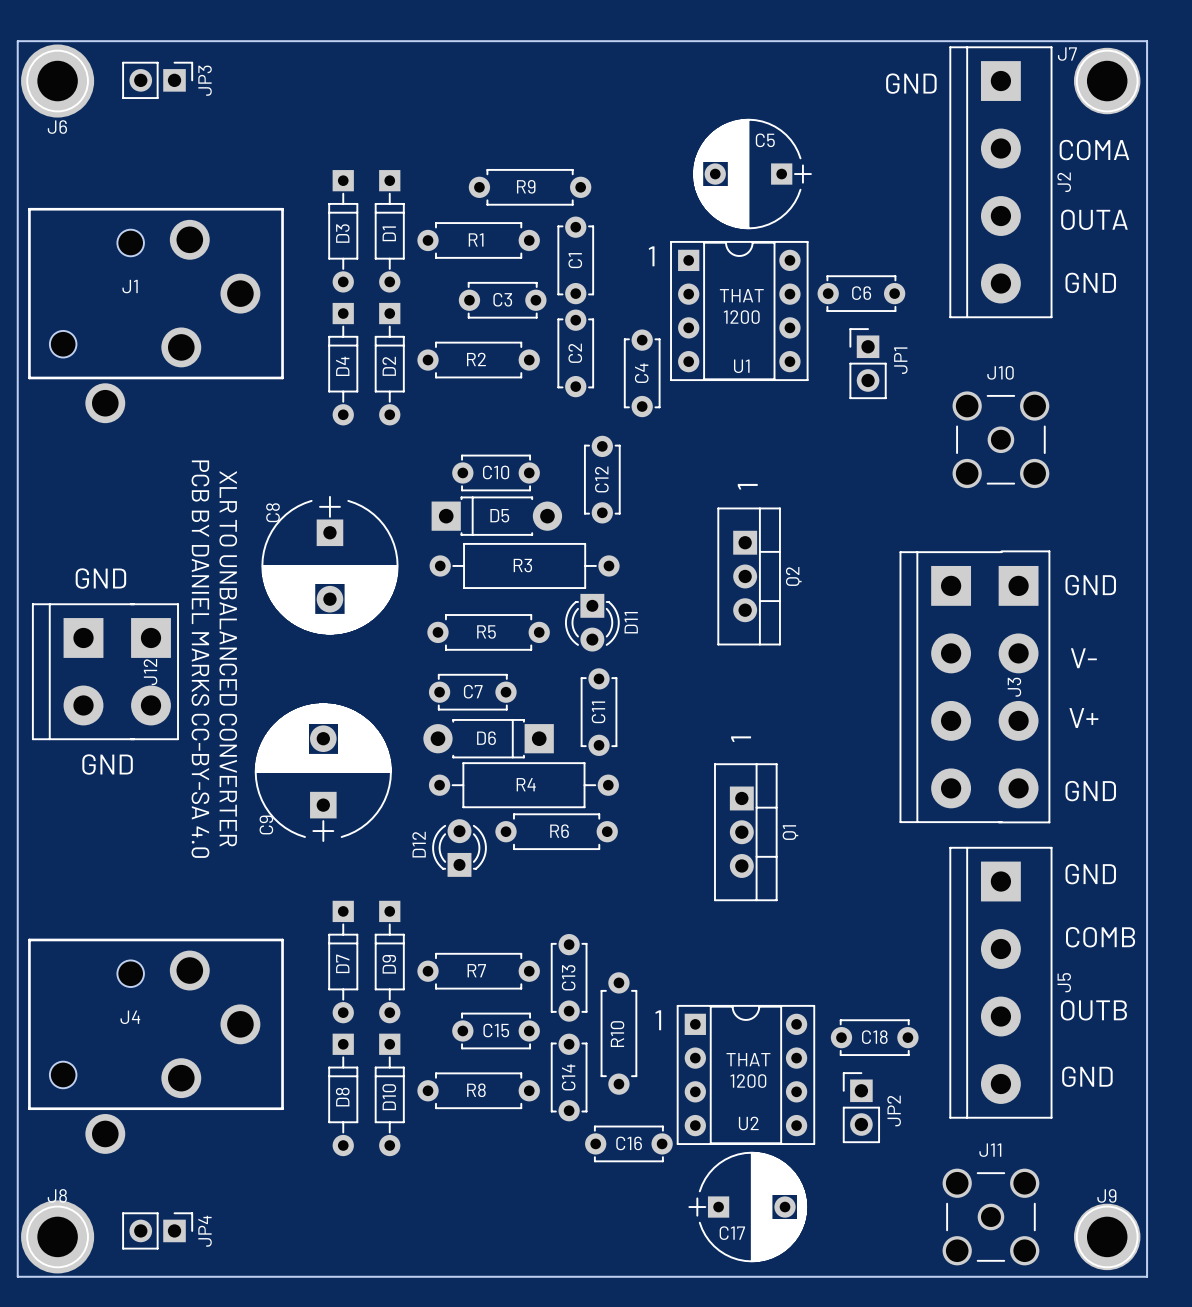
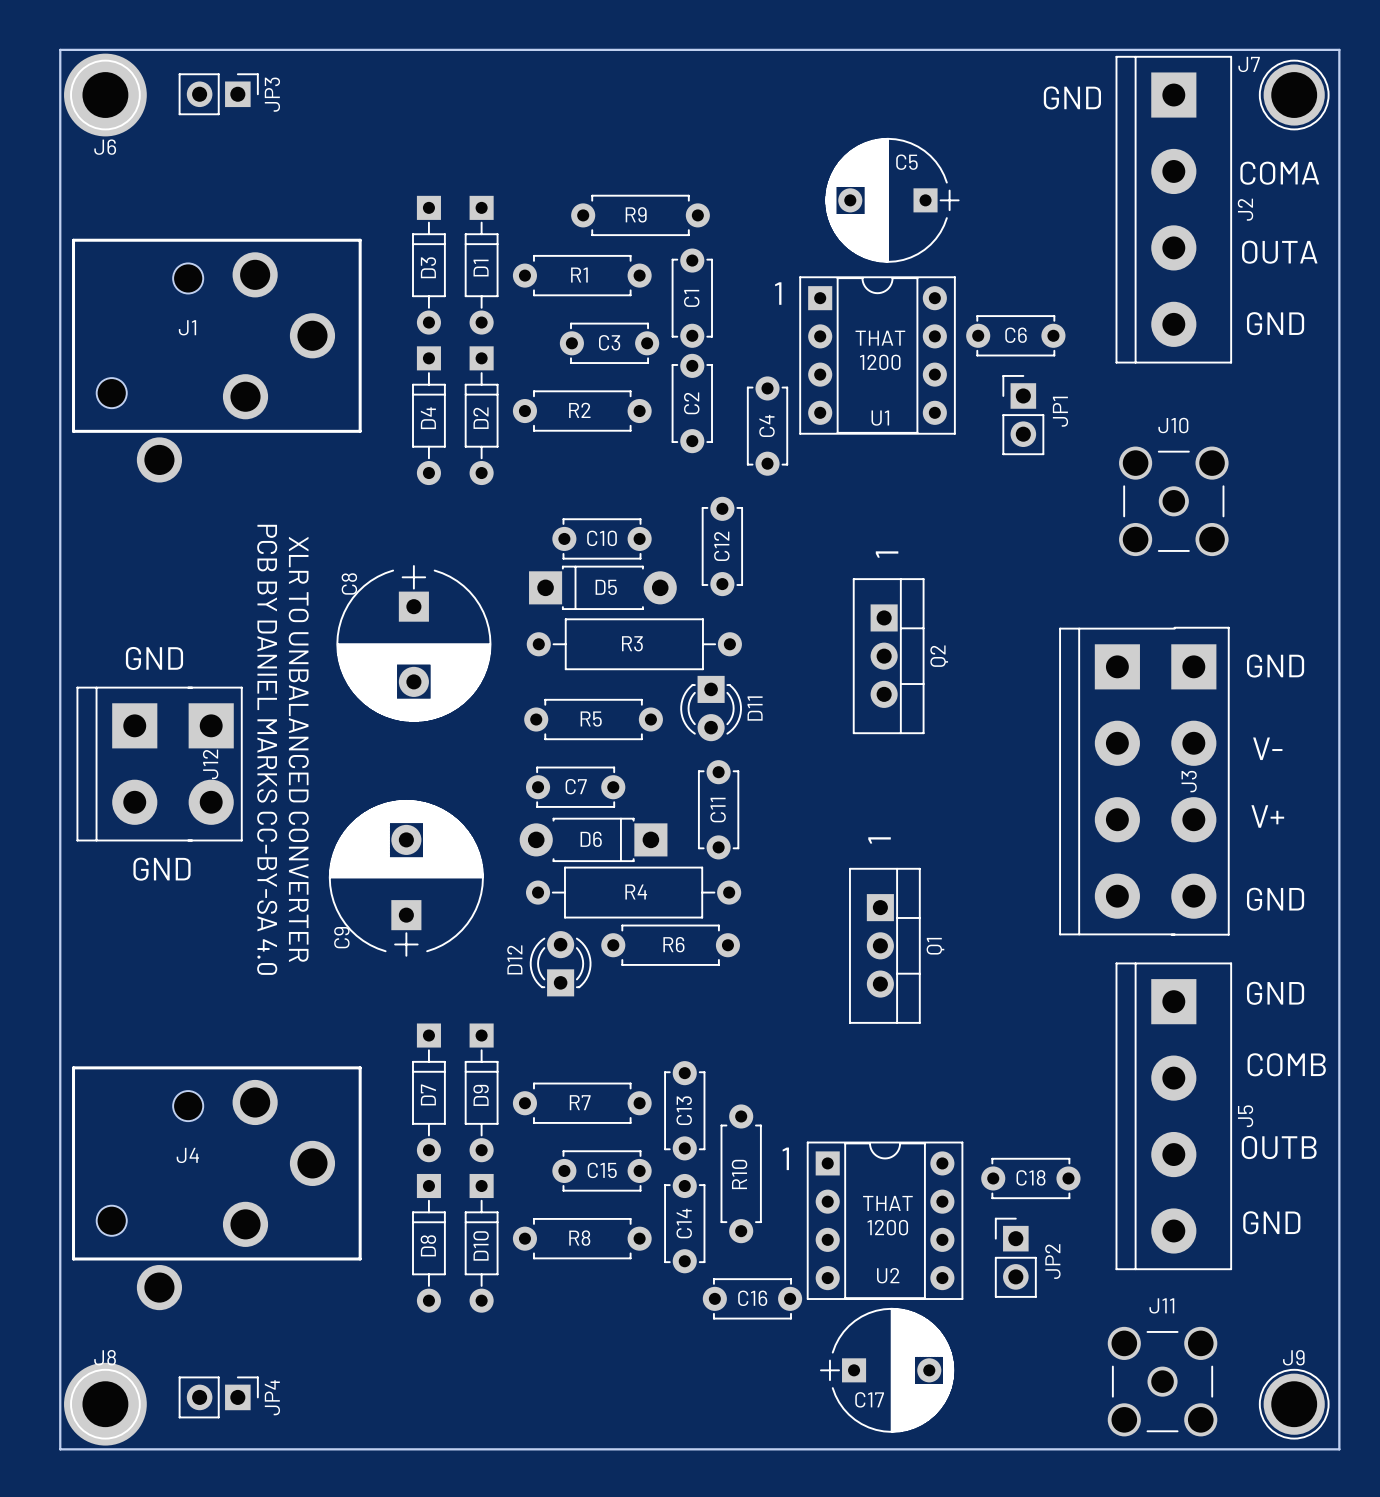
J7 footprint: [1073, 47, 1141, 115] -> [1258, 59, 1330, 131]
J9 footprint: [1073, 1203, 1141, 1271] -> [1258, 1368, 1330, 1440]

